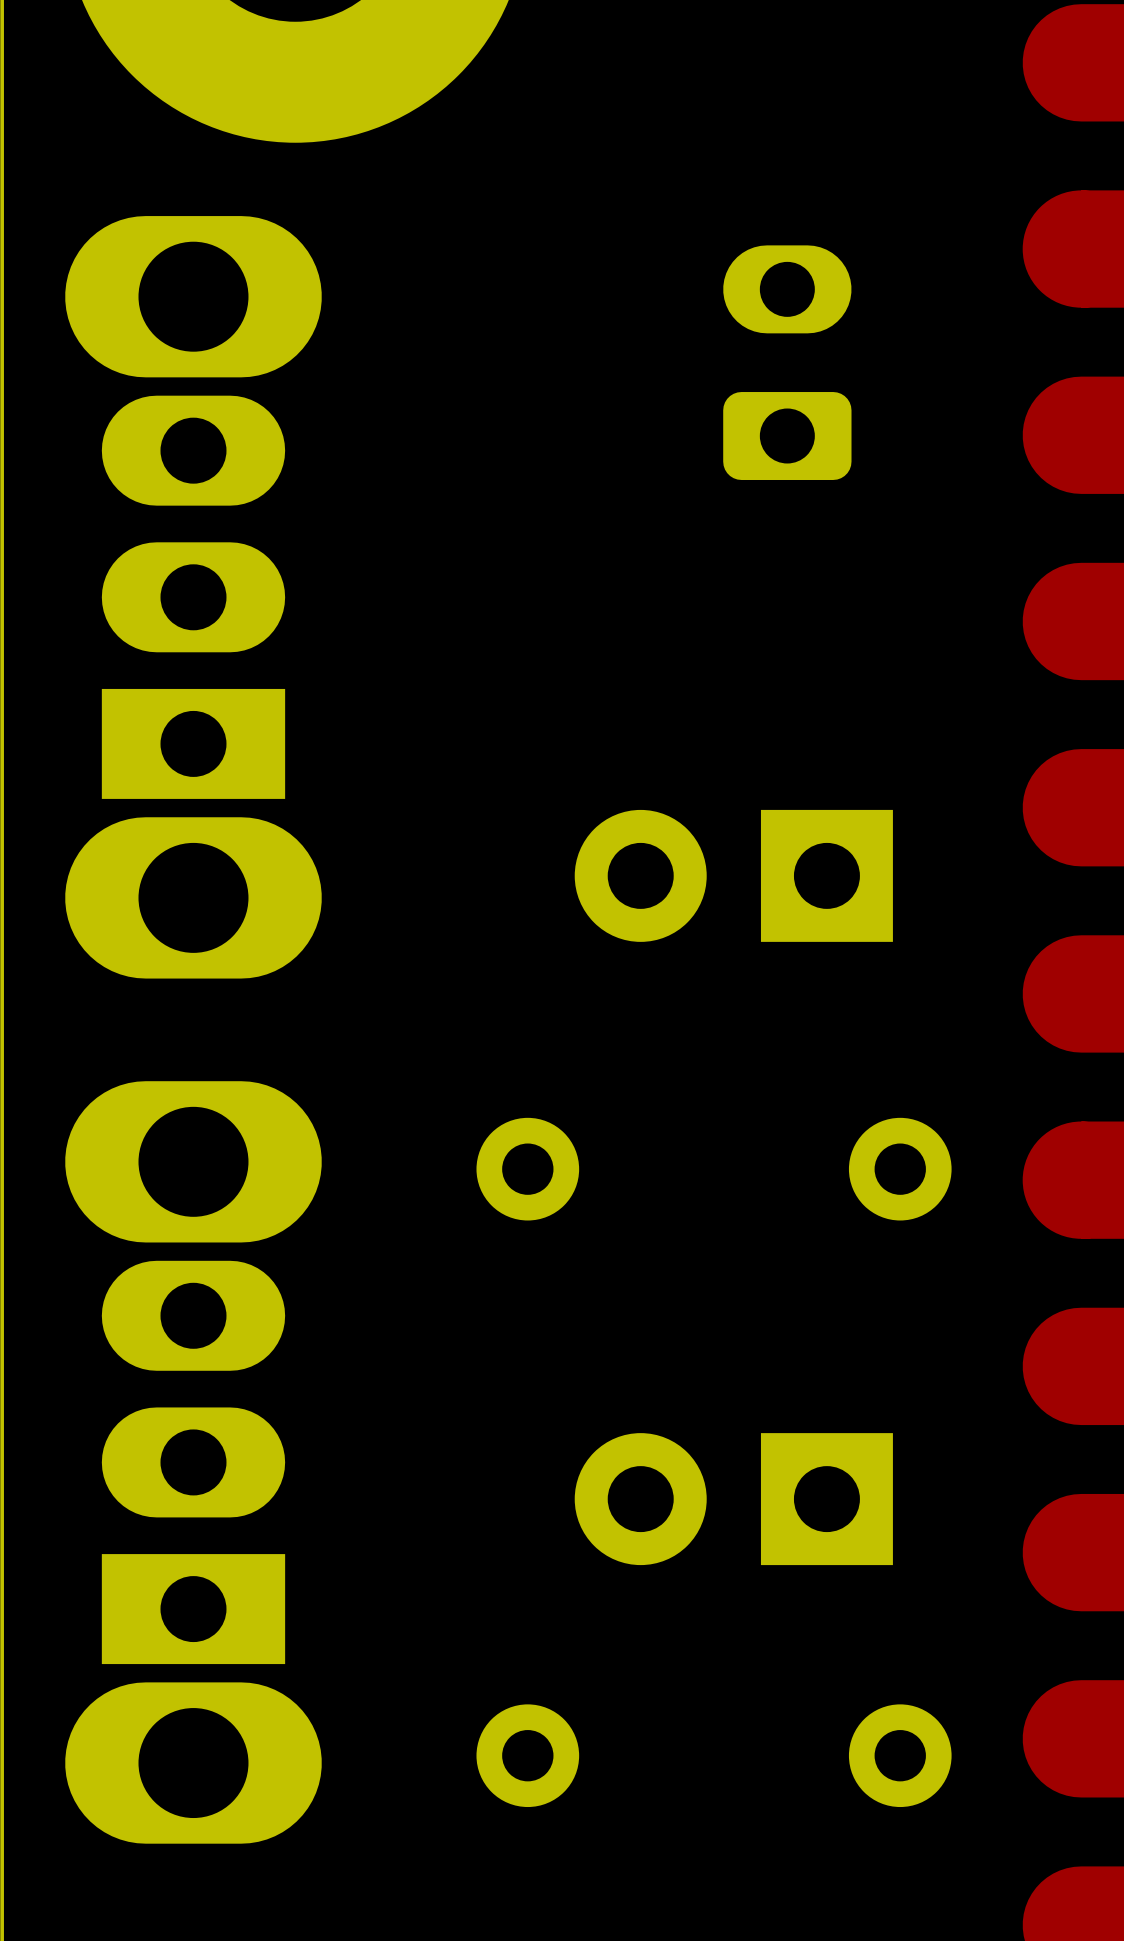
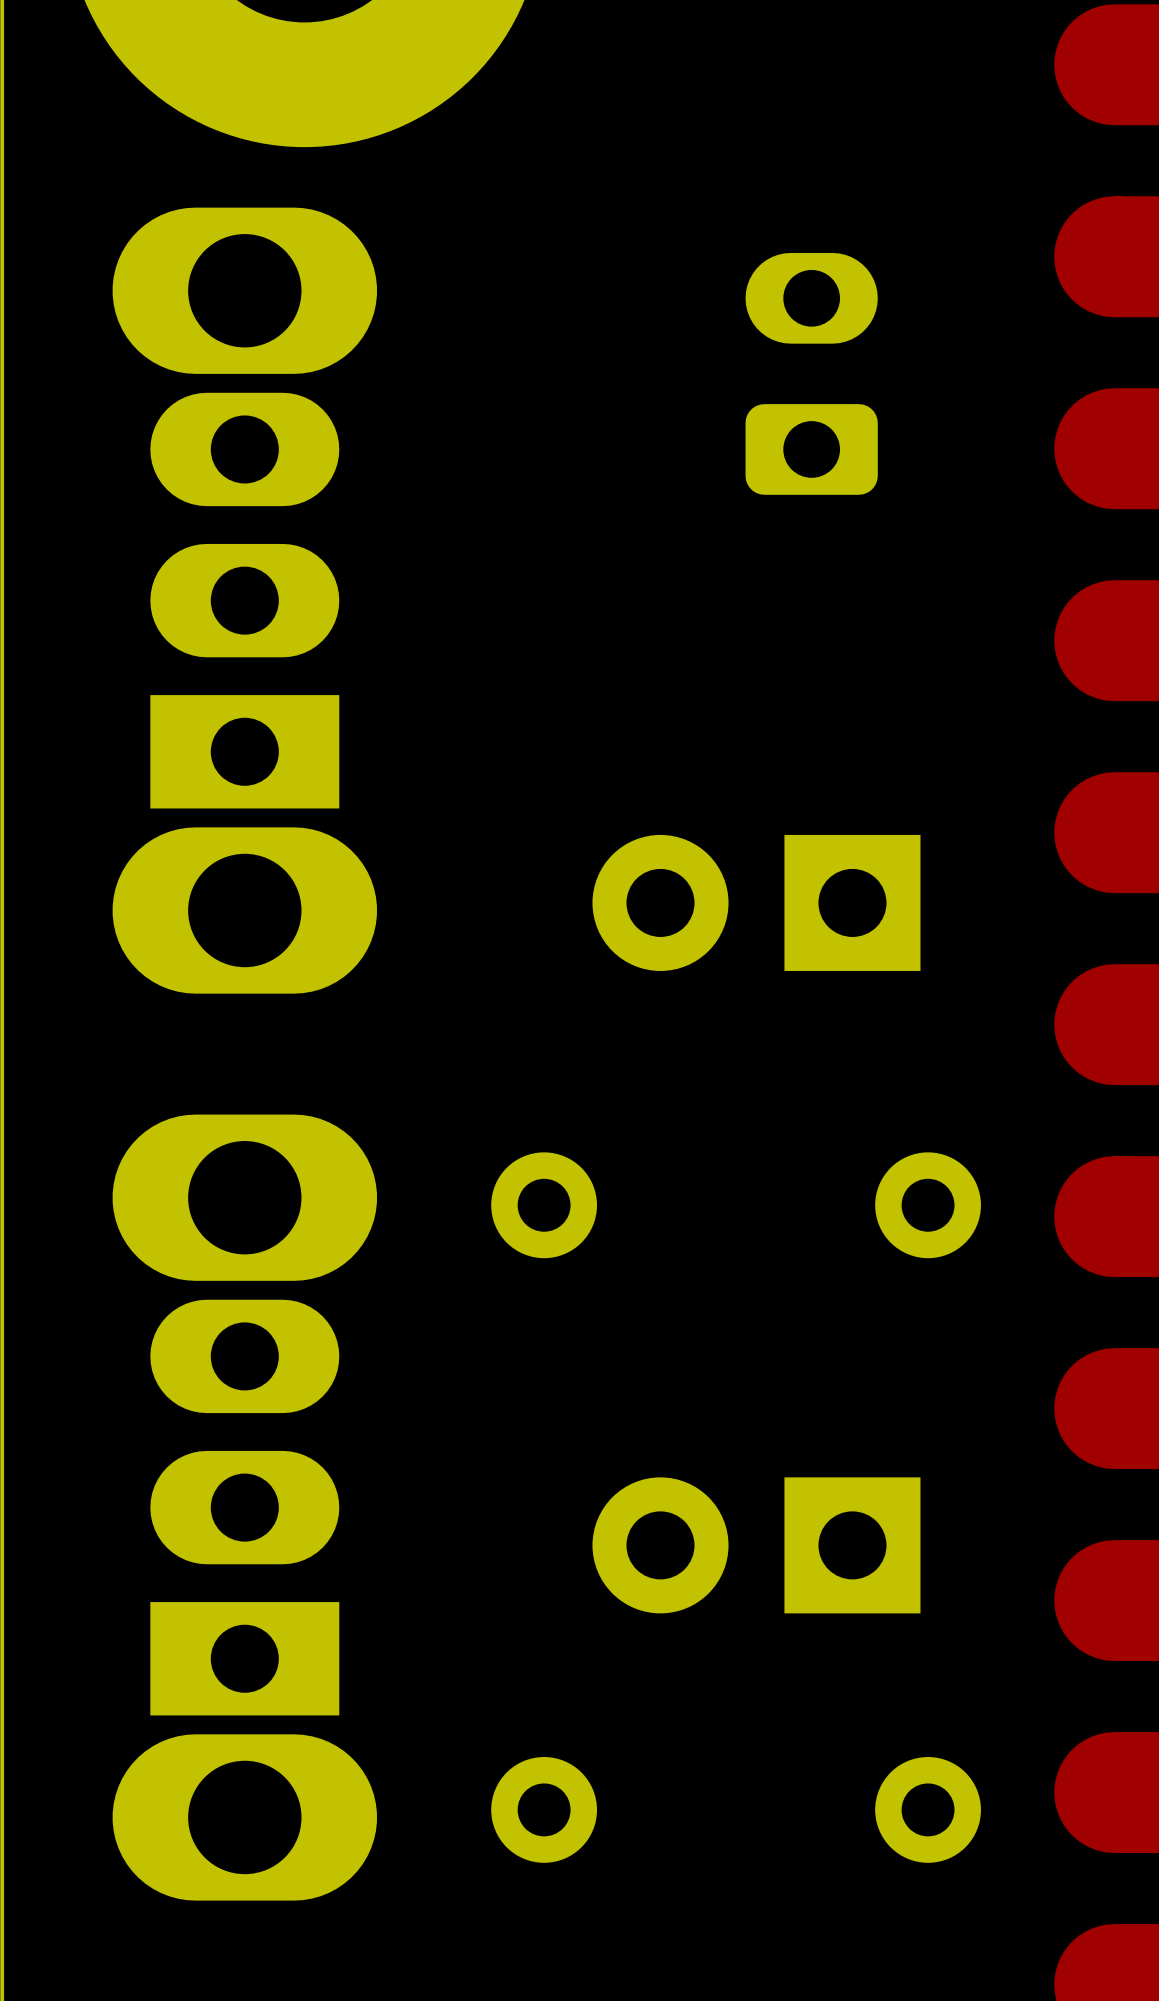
part position: (193, 597) -> (244, 600)
part position: (193, 1462) -> (244, 1507)

